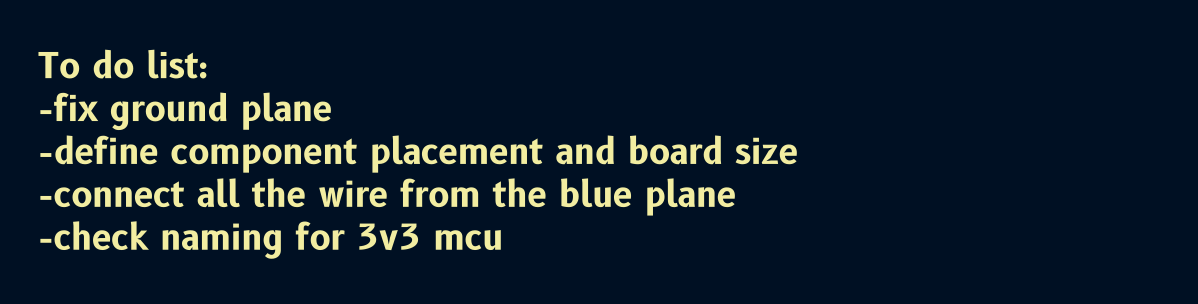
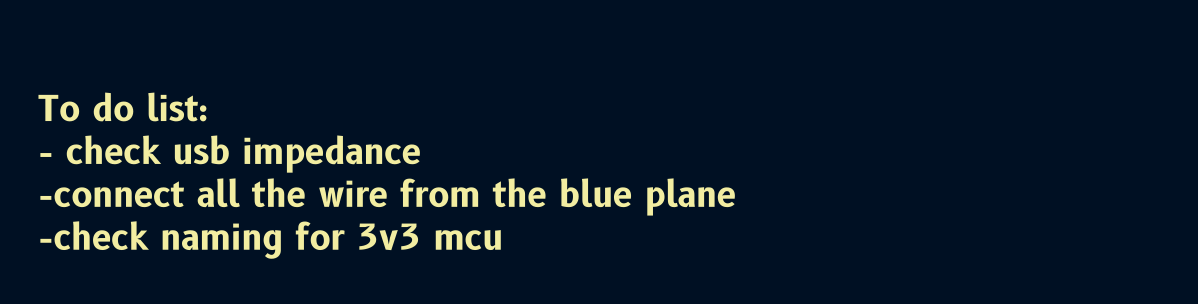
text: To do list: (122, 64) -> none
text: -fix ground plane (185, 111) -> To do list: (122, 106)
text: -define component placement and board size (418, 154) -> - check usb impedance (230, 154)

